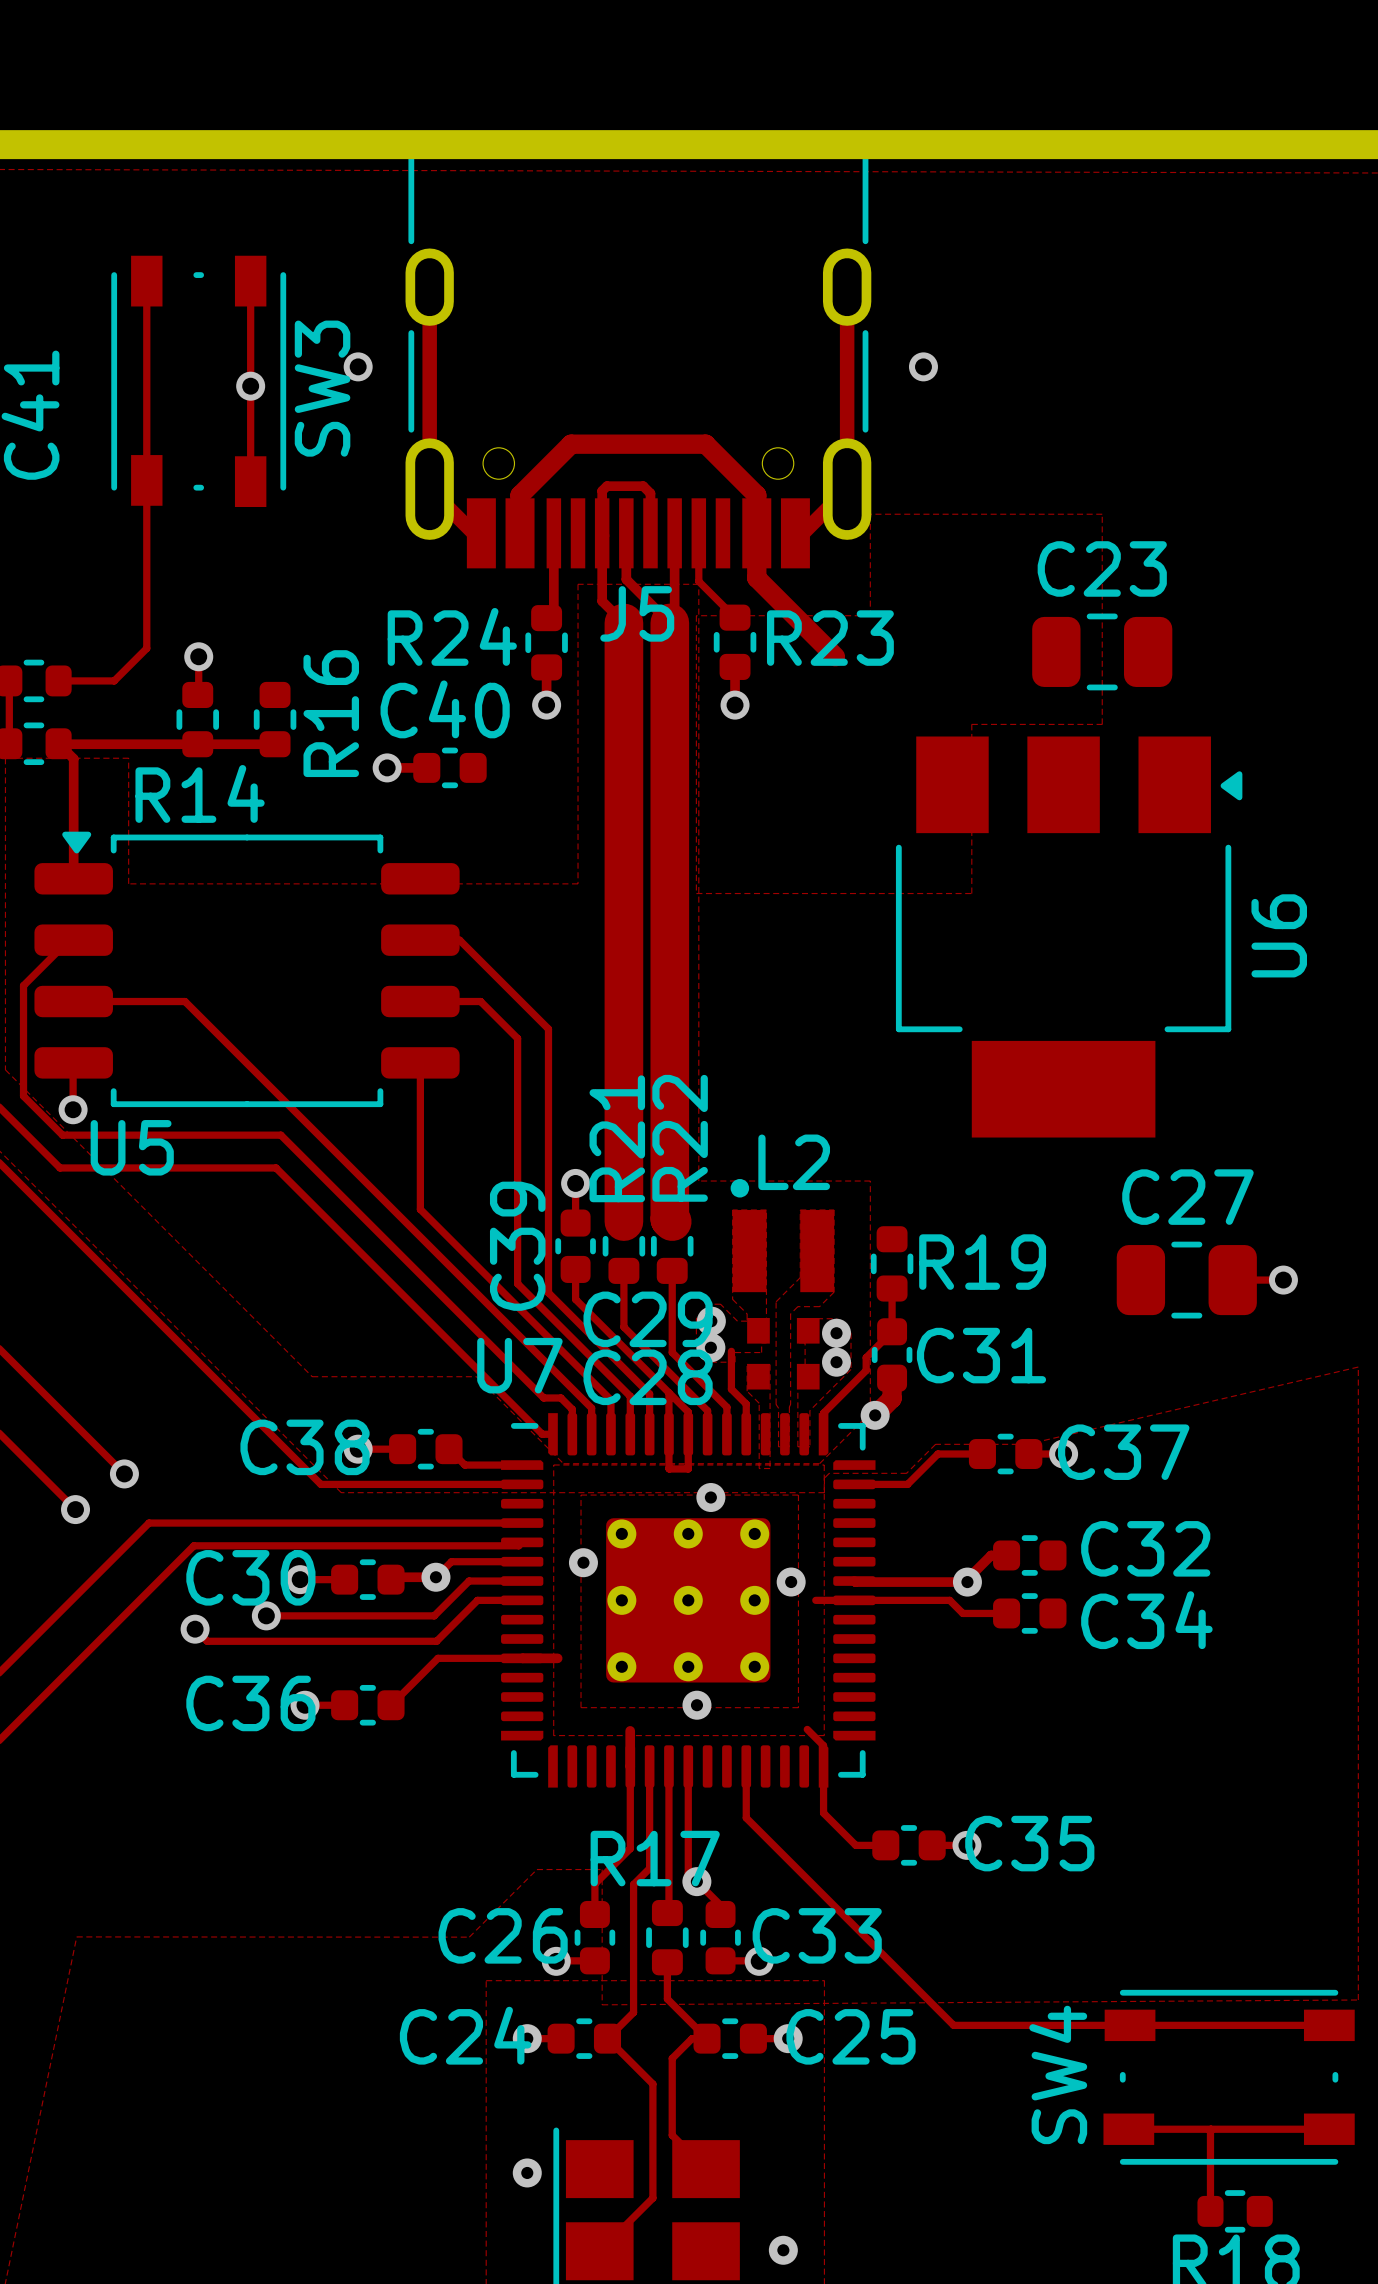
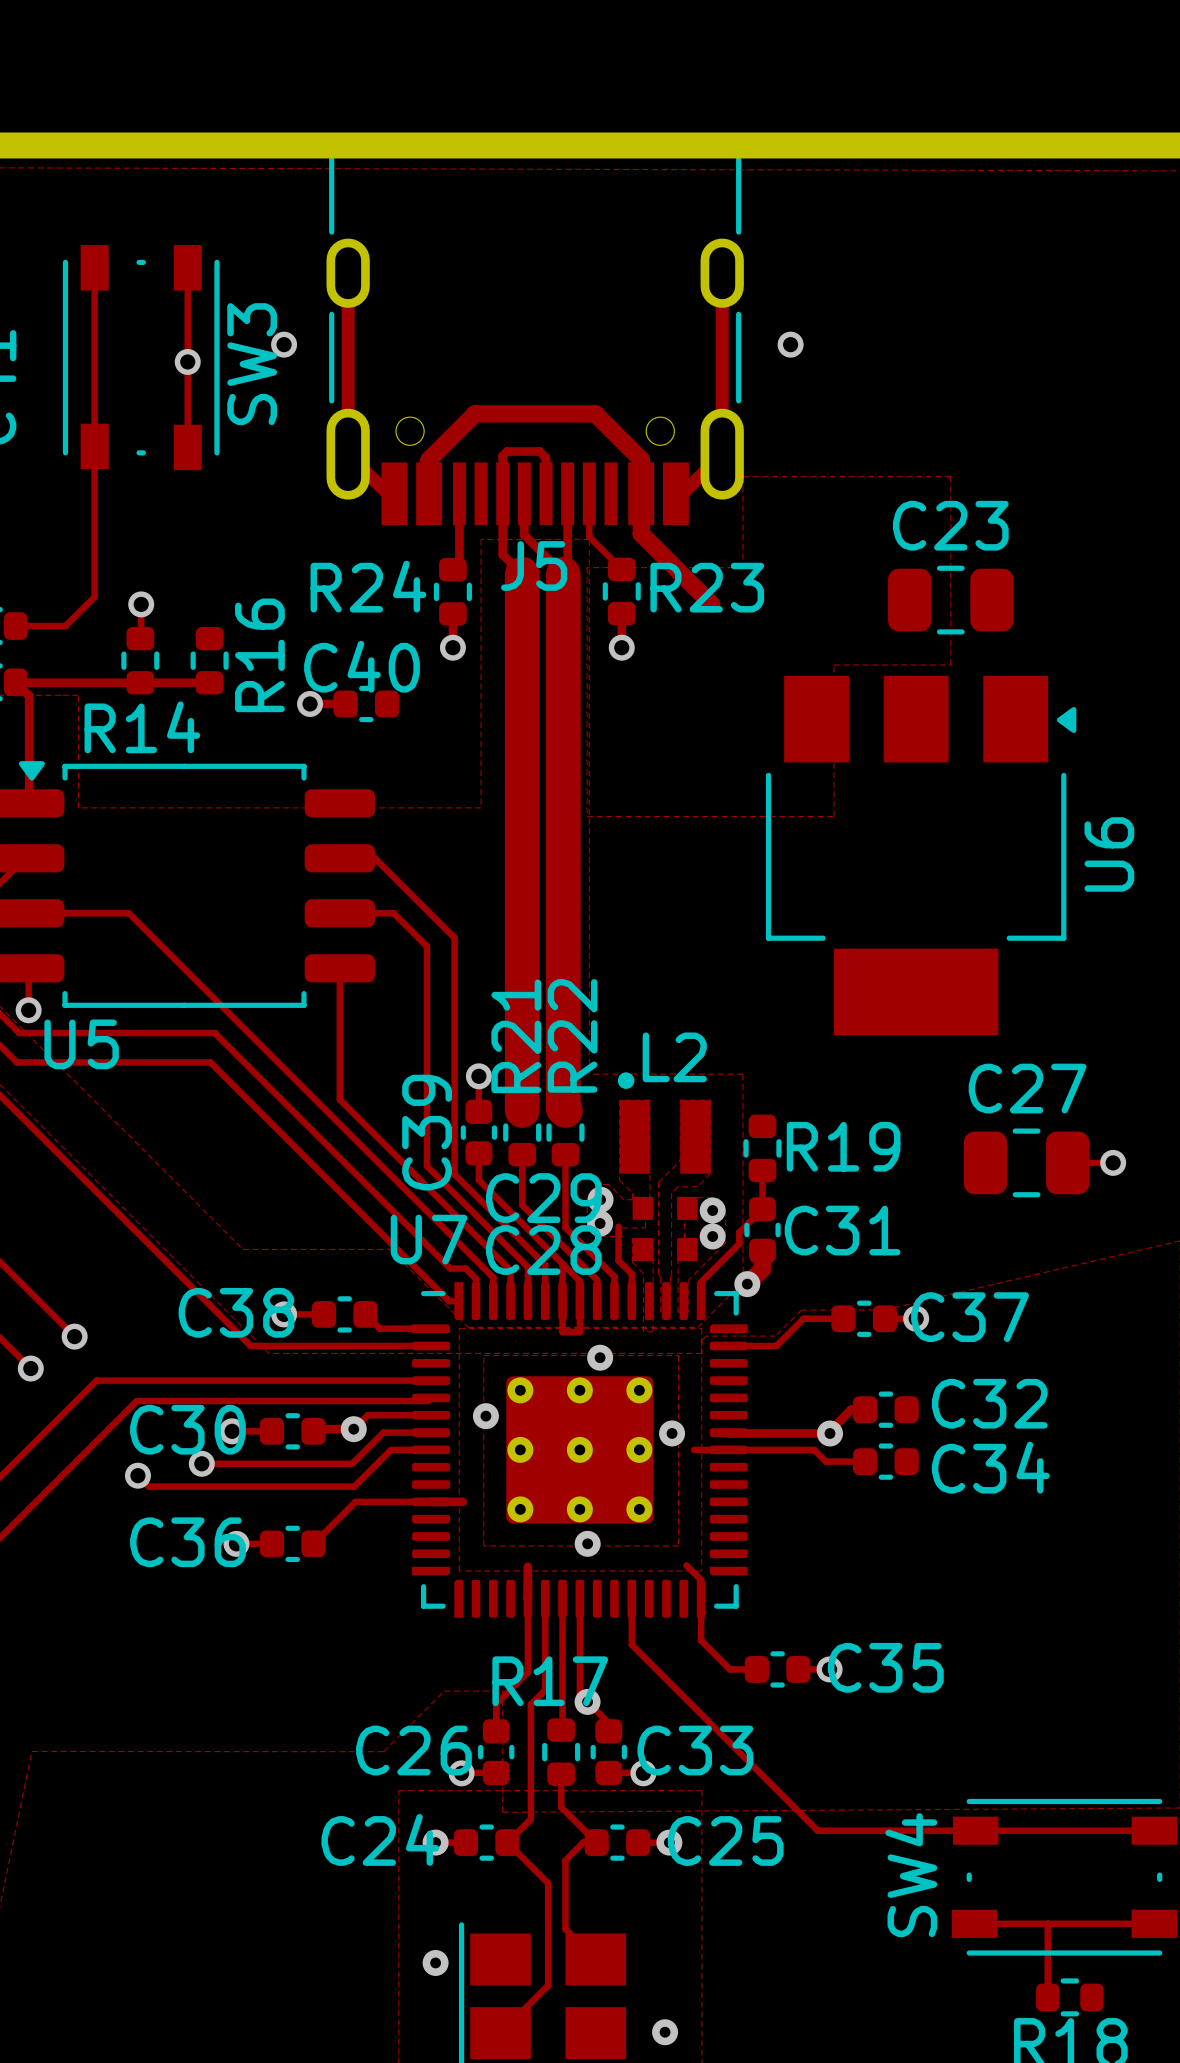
C40 name position: C40 (445, 709) -> C40 (362, 666)

